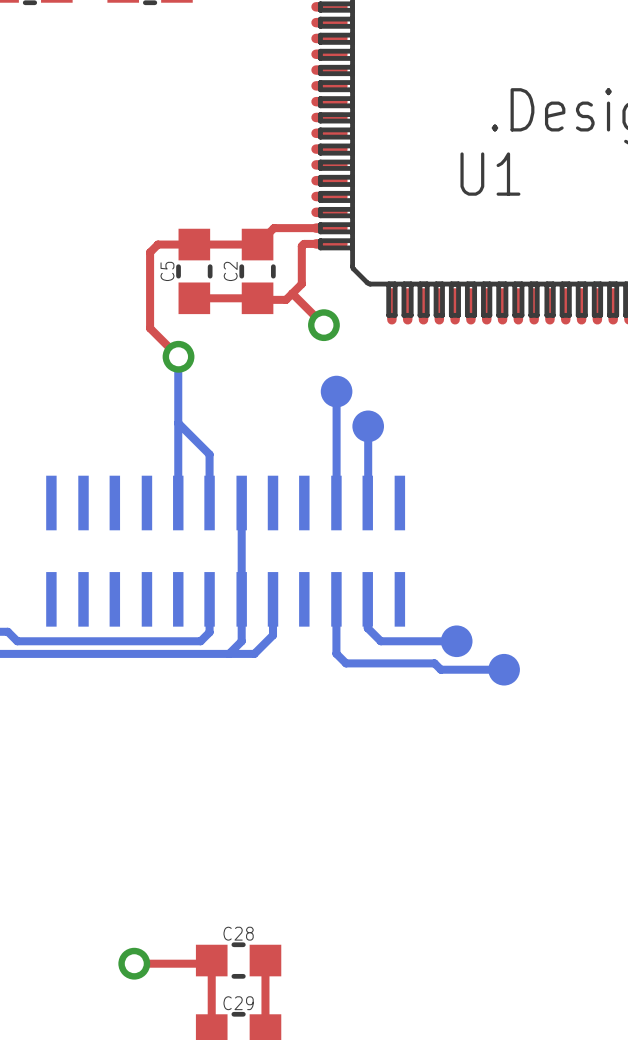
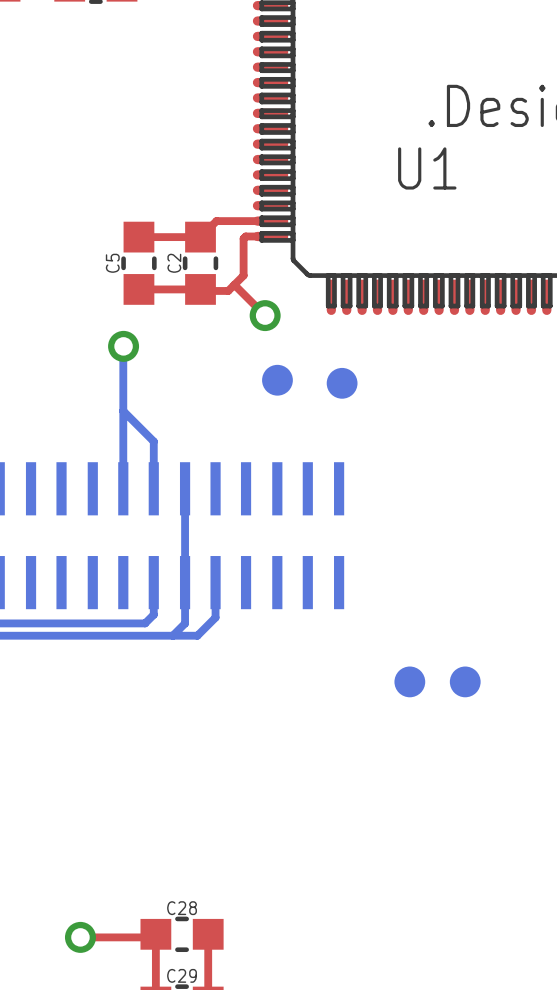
top track: (194, 244) (157, 244) (150, 252) (150, 328) (178, 356) -> none
bottom track: (336, 391) (336, 502) -> none
bottom track: (368, 426) (367, 503) -> none
part position: (368, 426) -> (342, 383)
bottom track: (336, 599) (336, 653) (346, 663) (434, 663) (440, 669) (504, 669) -> none
bottom track: (367, 599) (367, 628) (380, 641) (456, 641) -> none
part: (456, 641) -> none
part: (504, 669) -> none
part: none -> (409, 681)
part: none -> (465, 681)

